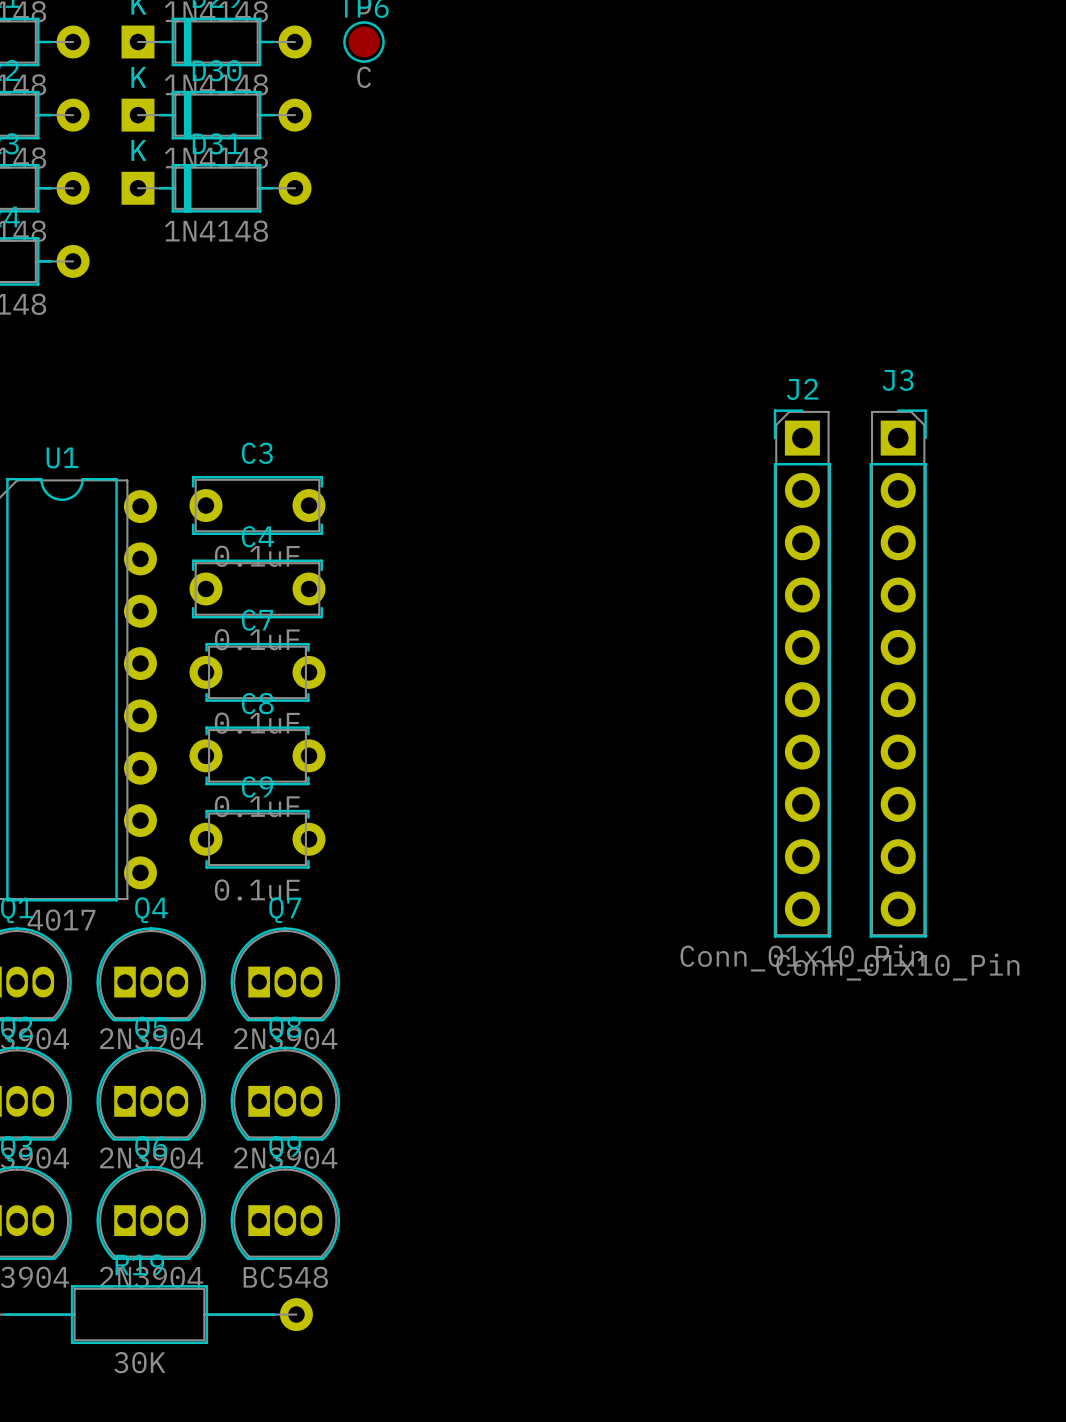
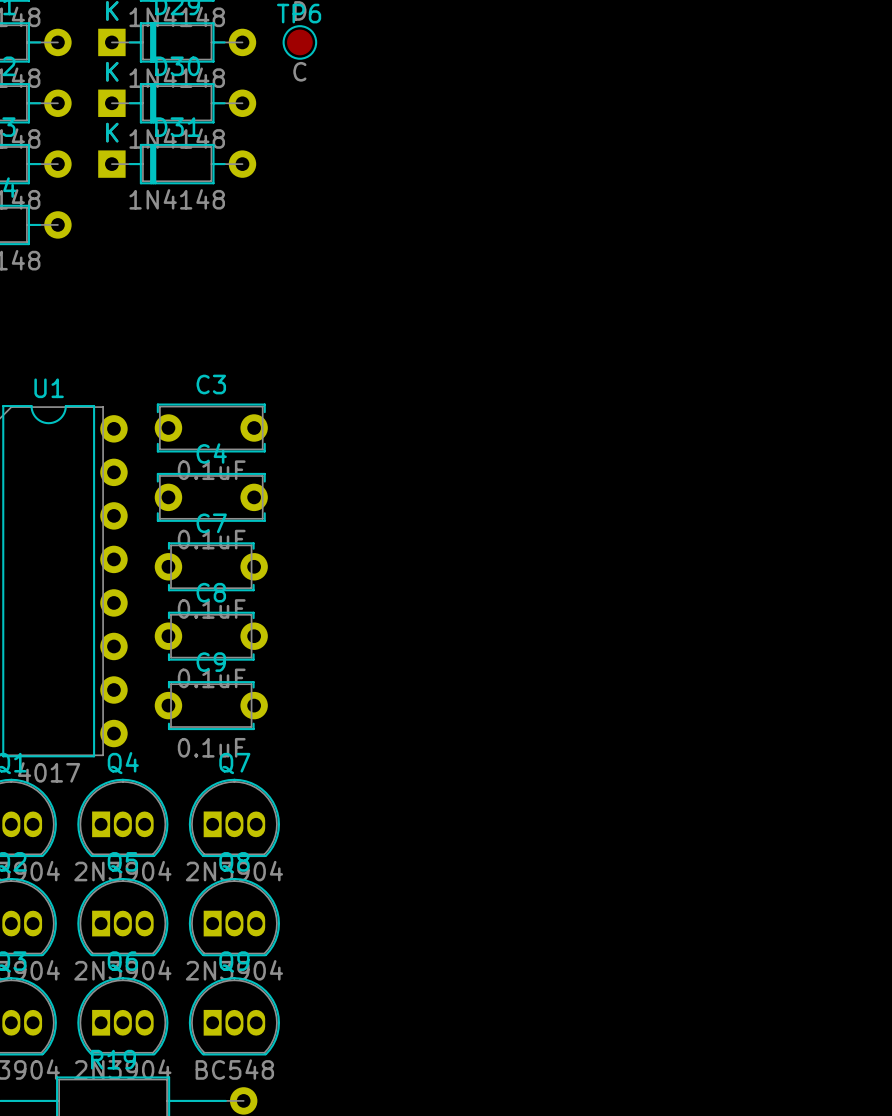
J2: Conn_01x10_Pin (802, 673) -> none
J3: Conn_01x10_Pin (898, 673) -> none

